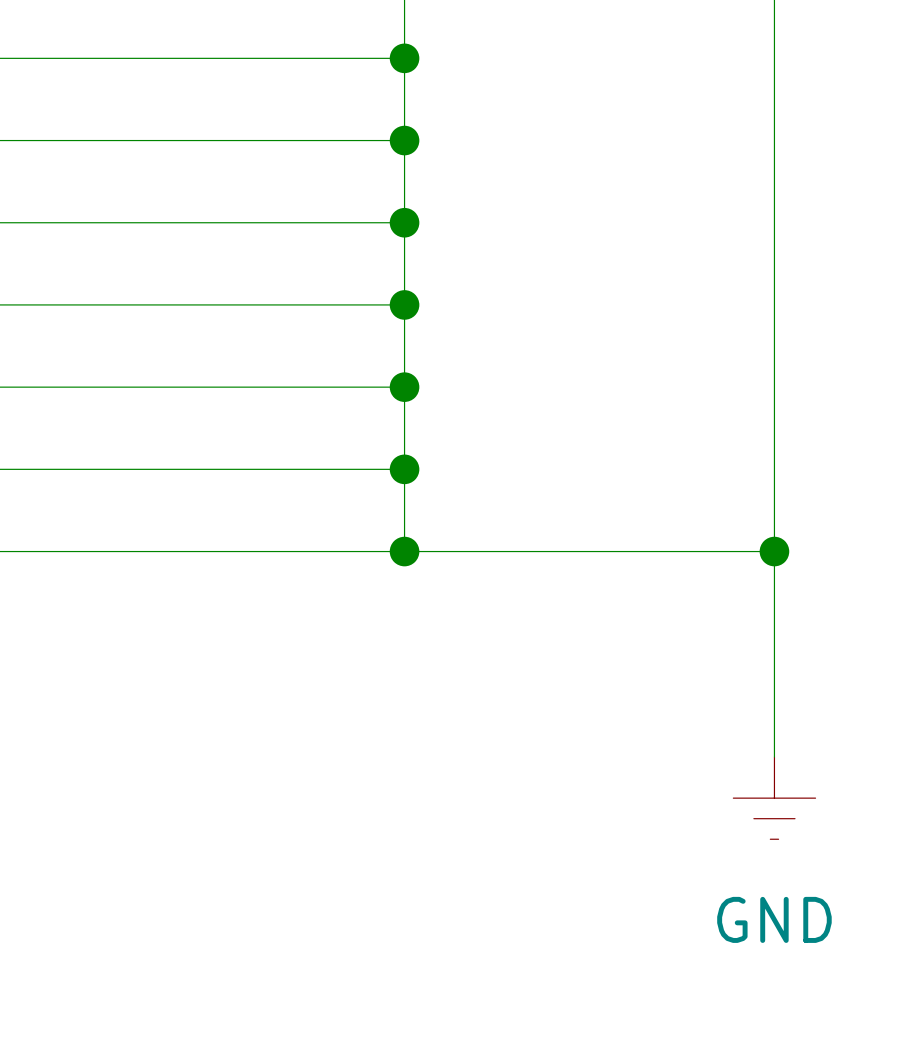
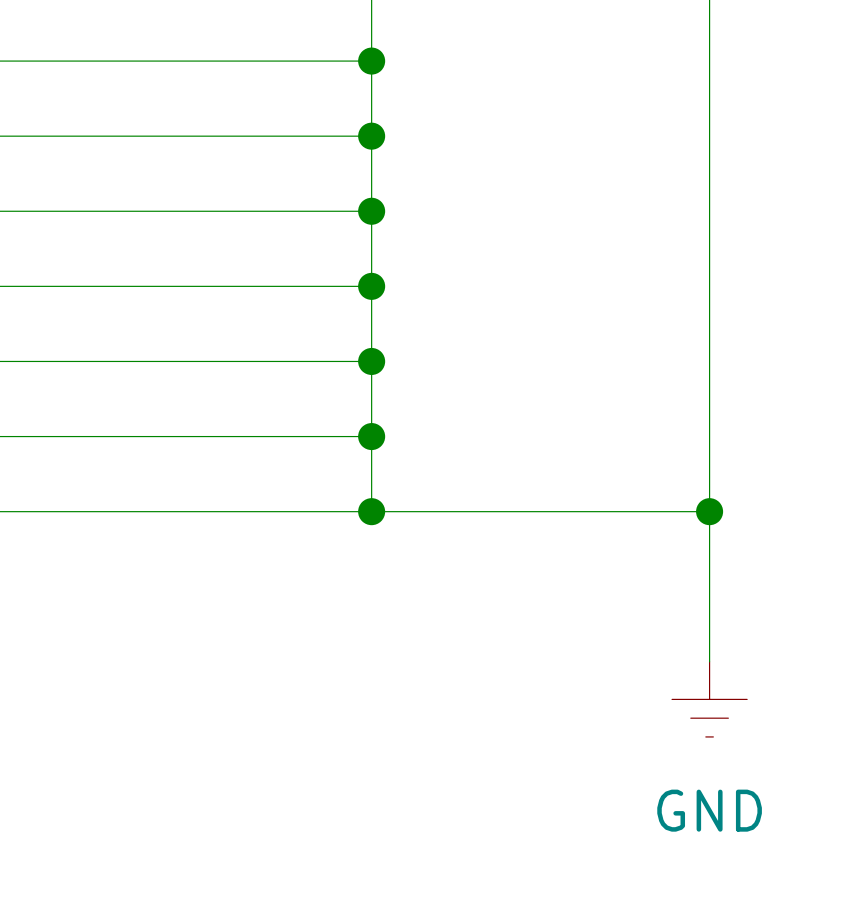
power symbol position: GND (774, 798) -> GND (709, 699)

